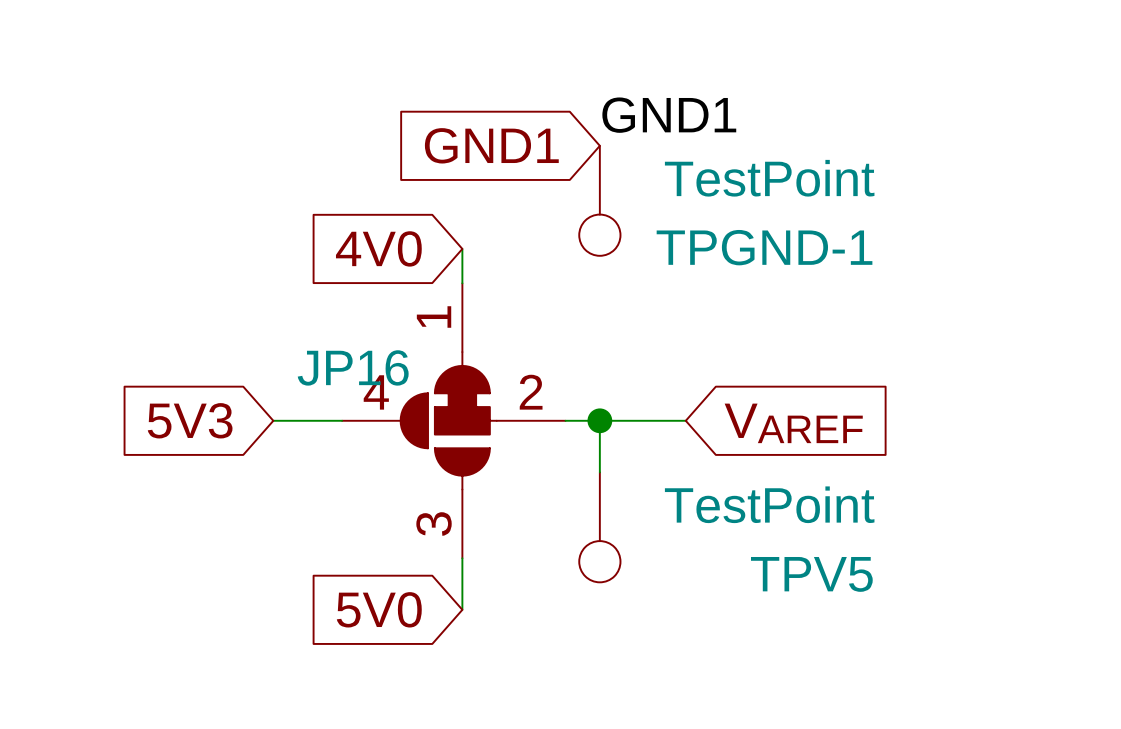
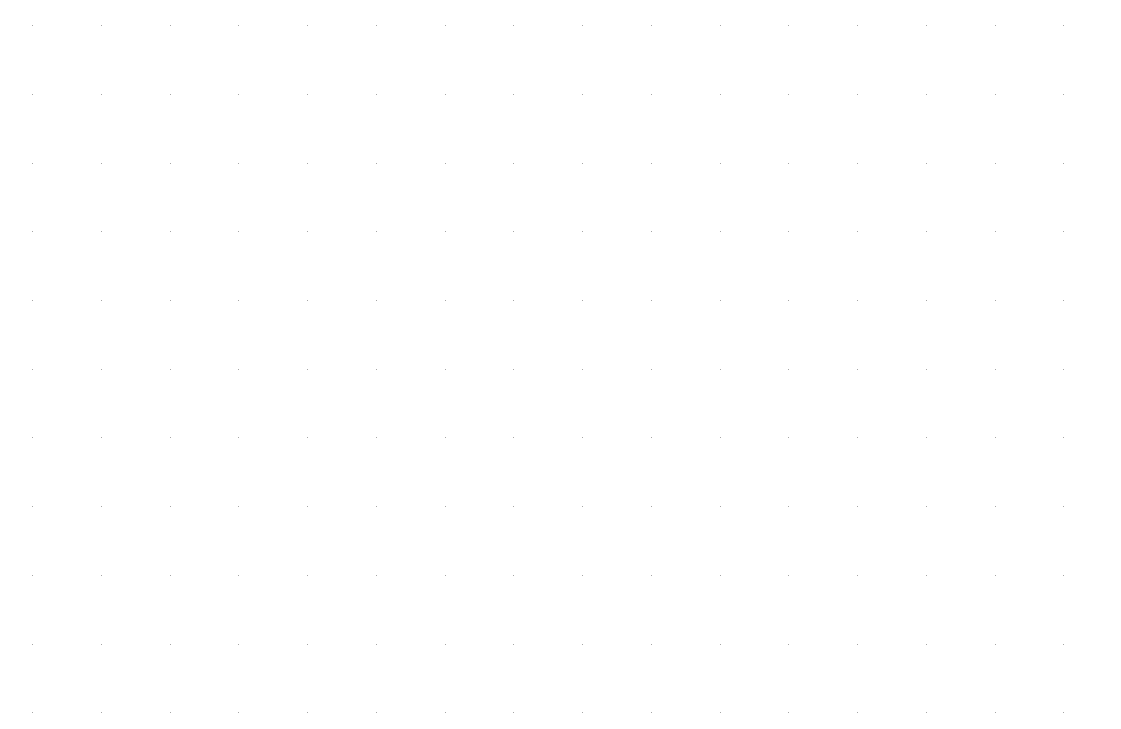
label: GND1 (669, 115) -> none
global label: GND1 (491, 145) -> none
TPGND-1: TestPoint (599, 200) -> none
global label: 4V0 (378, 248) -> none
wire: (462, 248) (462, 283) -> none
global label: 5V3 (190, 420) -> none
wire: (273, 420) (342, 420) -> none
JP16: (453, 420) -> none
wire: (565, 420) (685, 420) -> none
wire: (599, 420) (599, 472) -> none
junction: (599, 420) -> none
global label: VAREF (793, 423) -> none
TPV5: TestPoint (599, 527) -> none
wire: (462, 558) (462, 609) -> none
global label: 5V0 (379, 609) -> none

